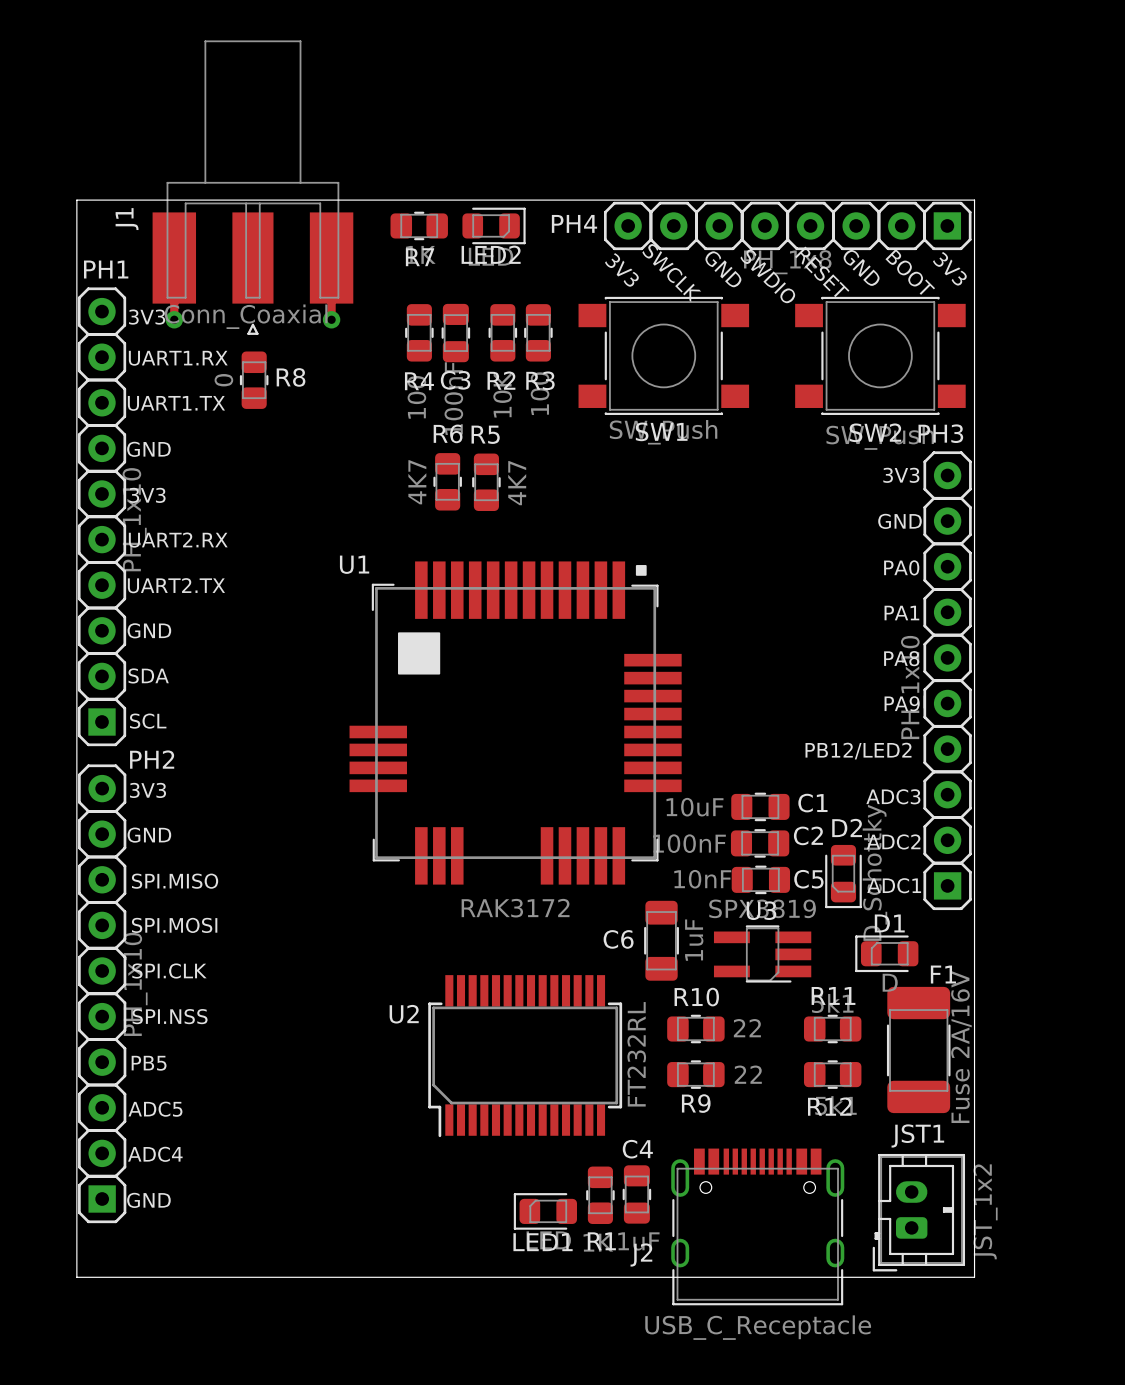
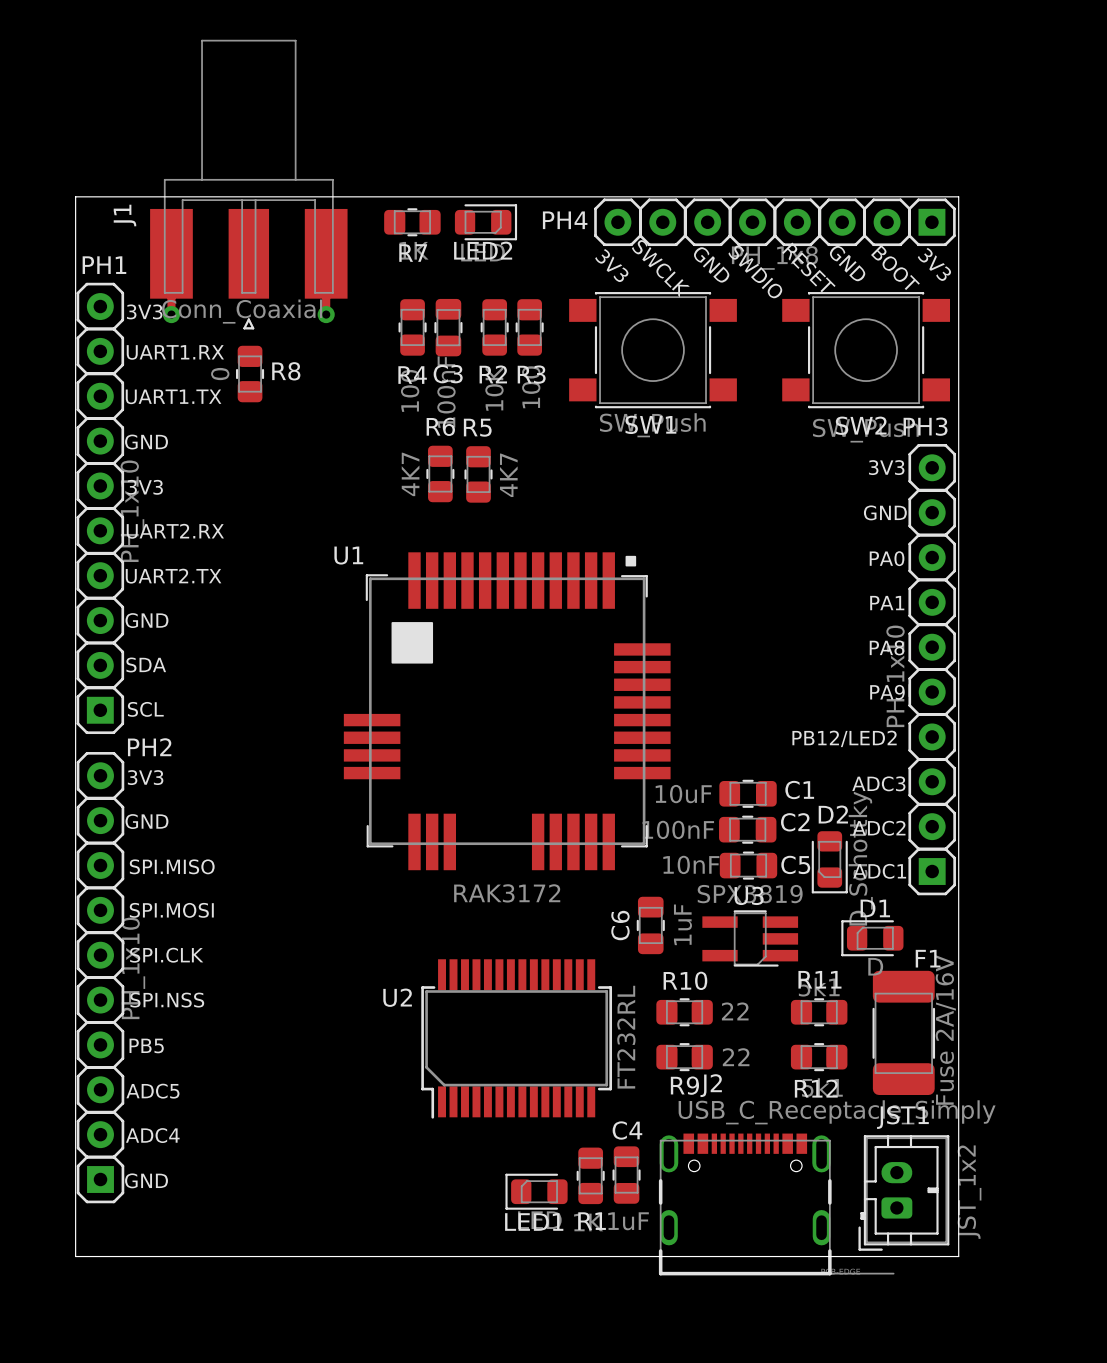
C6 footprint: [644, 900, 679, 981] -> [636, 896, 665, 955]
C6 name rotation: 0° (618, 939) -> 90° counterclockwise (620, 925)
J2 footprint: [671, 1148, 845, 1306] -> [658, 1133, 895, 1276]
J2 name position: J2 (641, 1254) -> J2 (711, 1085)
J2 value: USB_C_Receptacle (758, 1327) -> USB_C_Receptacle_Simply (837, 1112)

